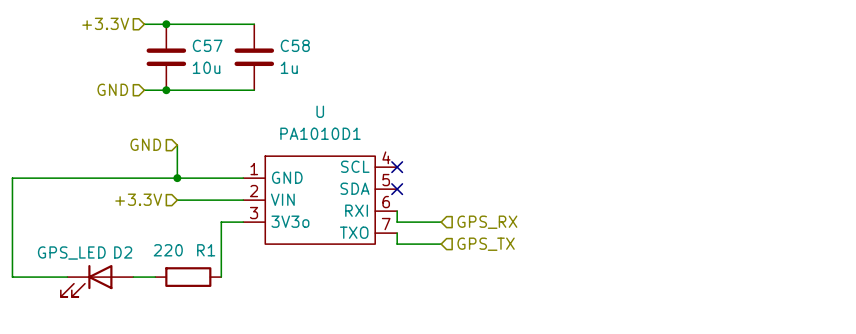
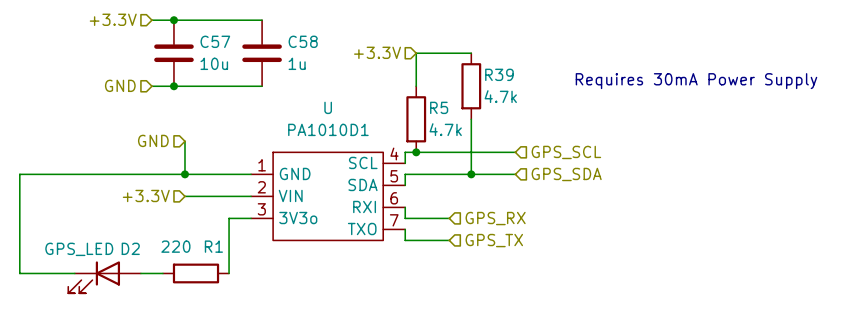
hierarchical label: none -> +3.3V (377, 52)
wire: none -> (471, 53) (416, 53) (416, 86)
text: none -> Requires 30mA Power Supply (696, 81)
R39: none -> 4.7k (471, 86)
R5: none -> 4.7k (416, 119)
wire: none -> (471, 119) (471, 174)
junction: none -> (416, 152)
wire: none -> (515, 152) (405, 152) (405, 163)
hierarchical label: none -> GPS_SCL (566, 152)
no-connect mark: (397, 167) -> none
junction: none -> (471, 174)
wire: none -> (515, 174) (405, 174) (405, 185)
hierarchical label: none -> GPS_SDA (566, 174)
no-connect mark: (397, 189) -> none

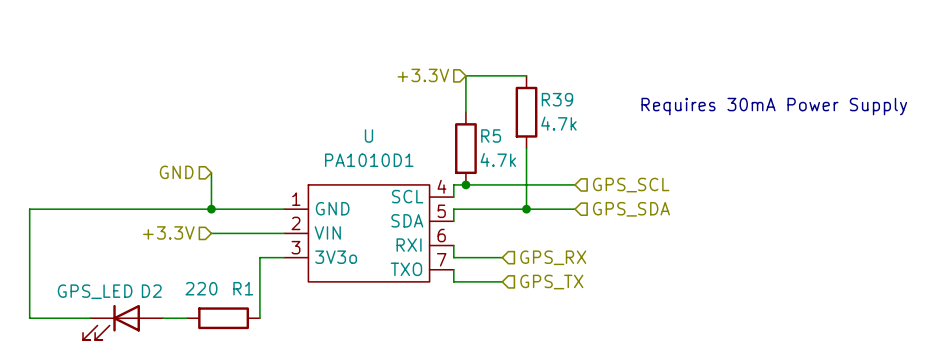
hierarchical label: +3.3V (113, 19) -> none
wire: (151, 20) (262, 20) -> none
junction: (173, 20) -> none
C57: 10u (173, 53) -> none
C58: 1u (262, 53) -> none
hierarchical label: GND (120, 85) -> none
wire: (151, 86) (262, 86) -> none
junction: (173, 86) -> none

